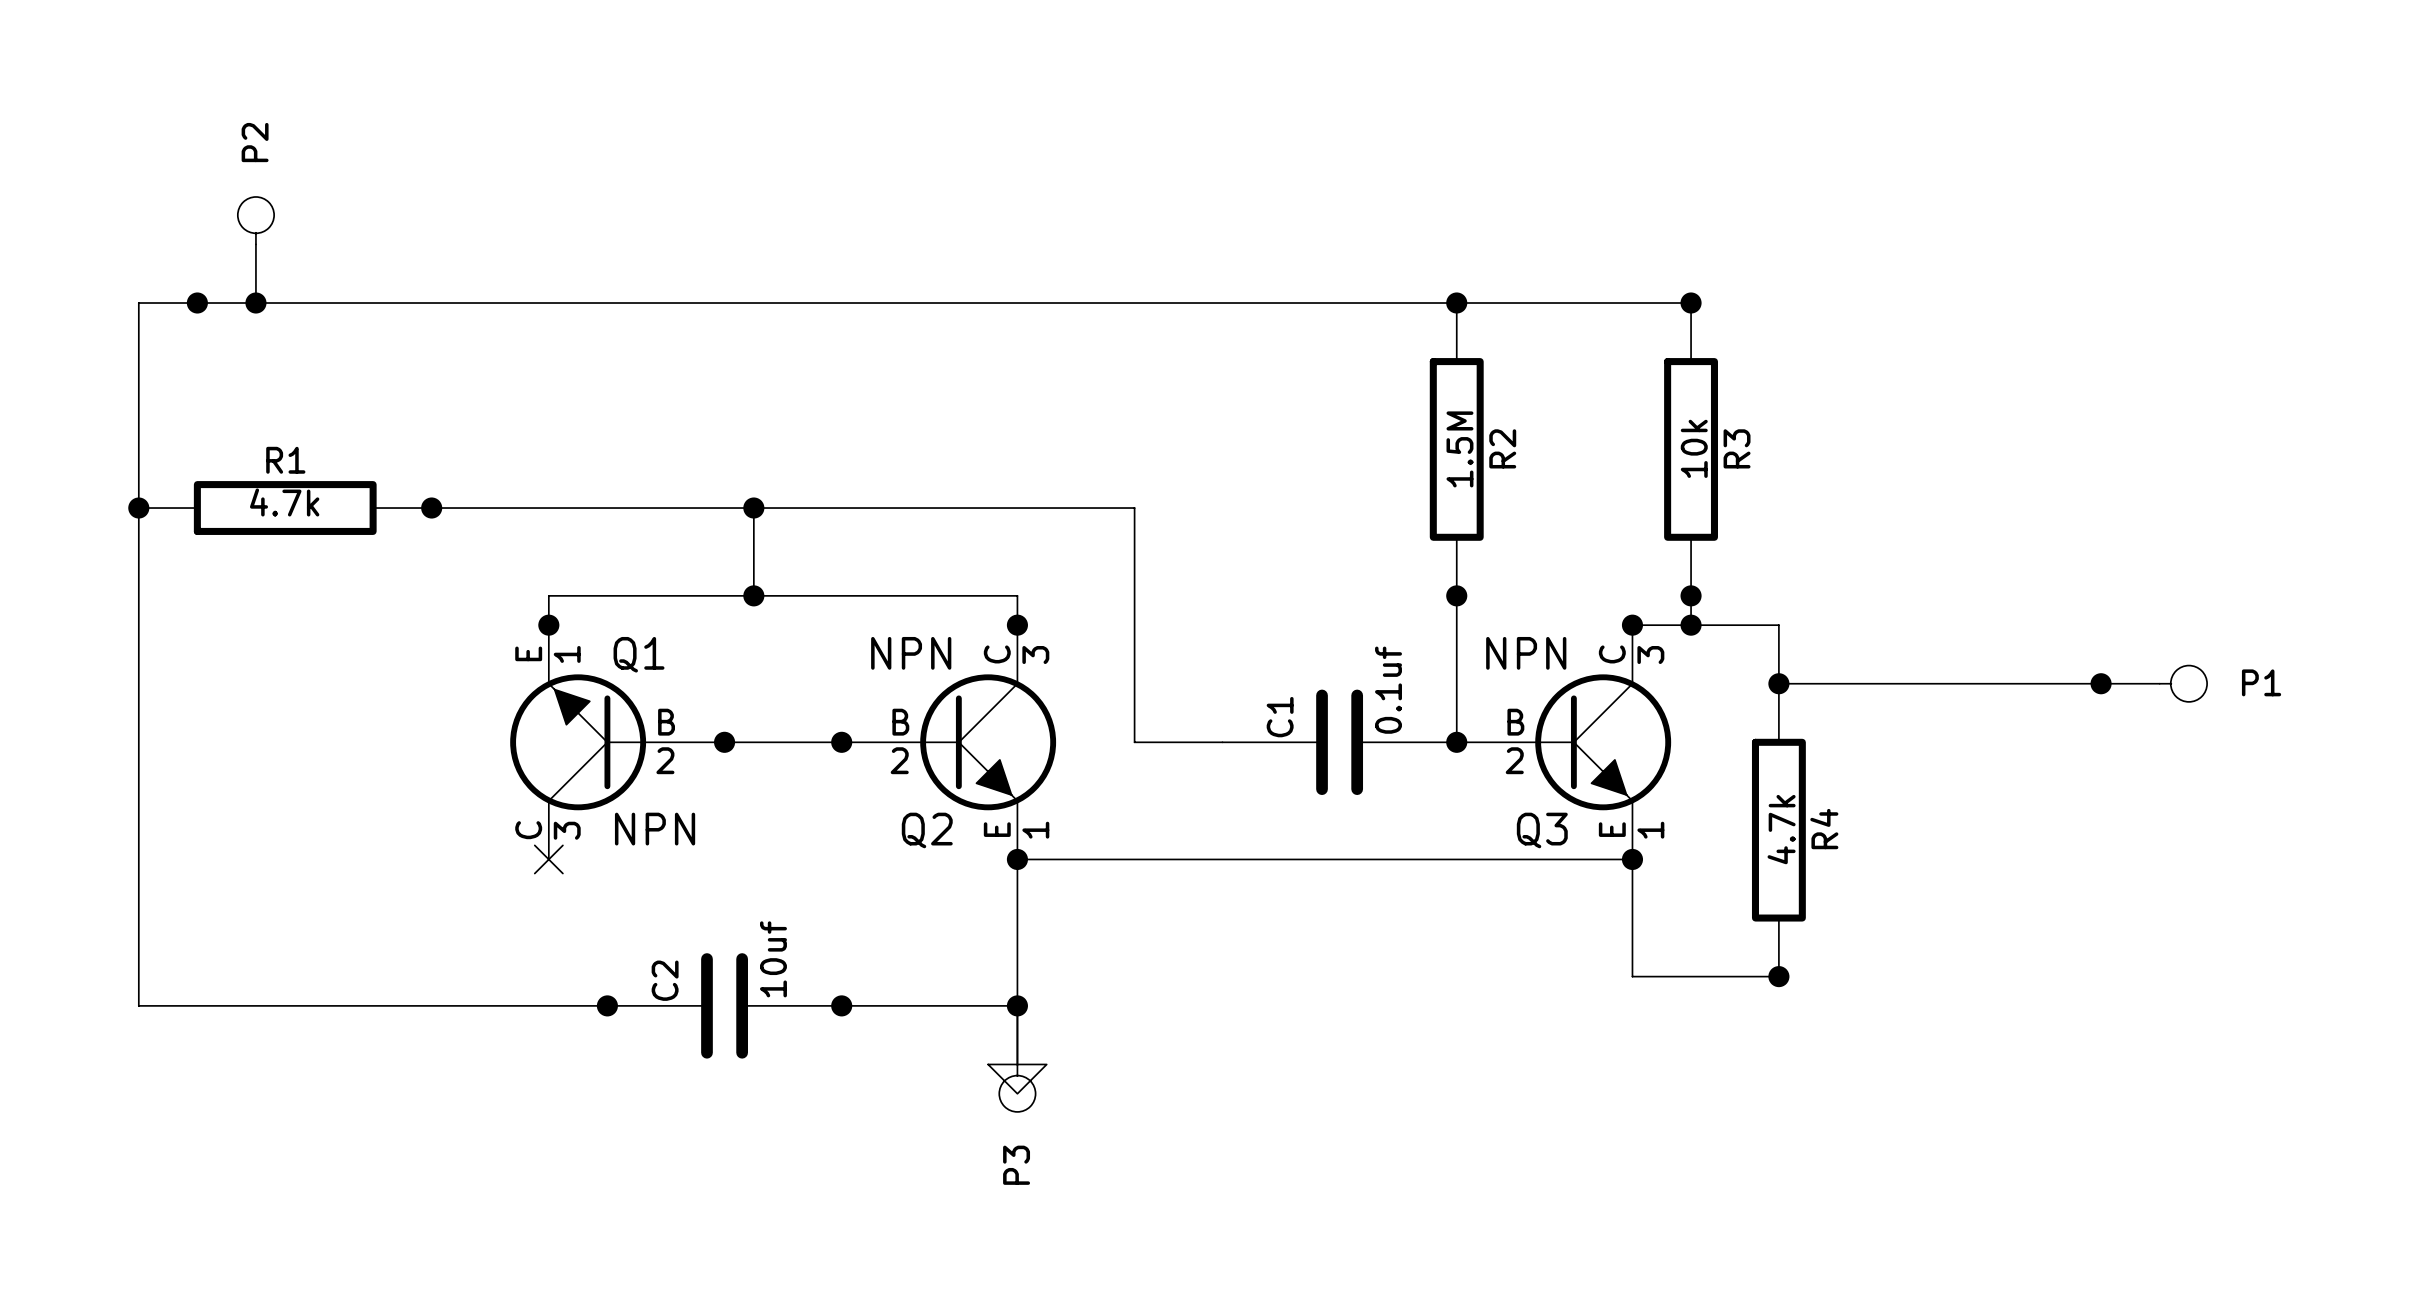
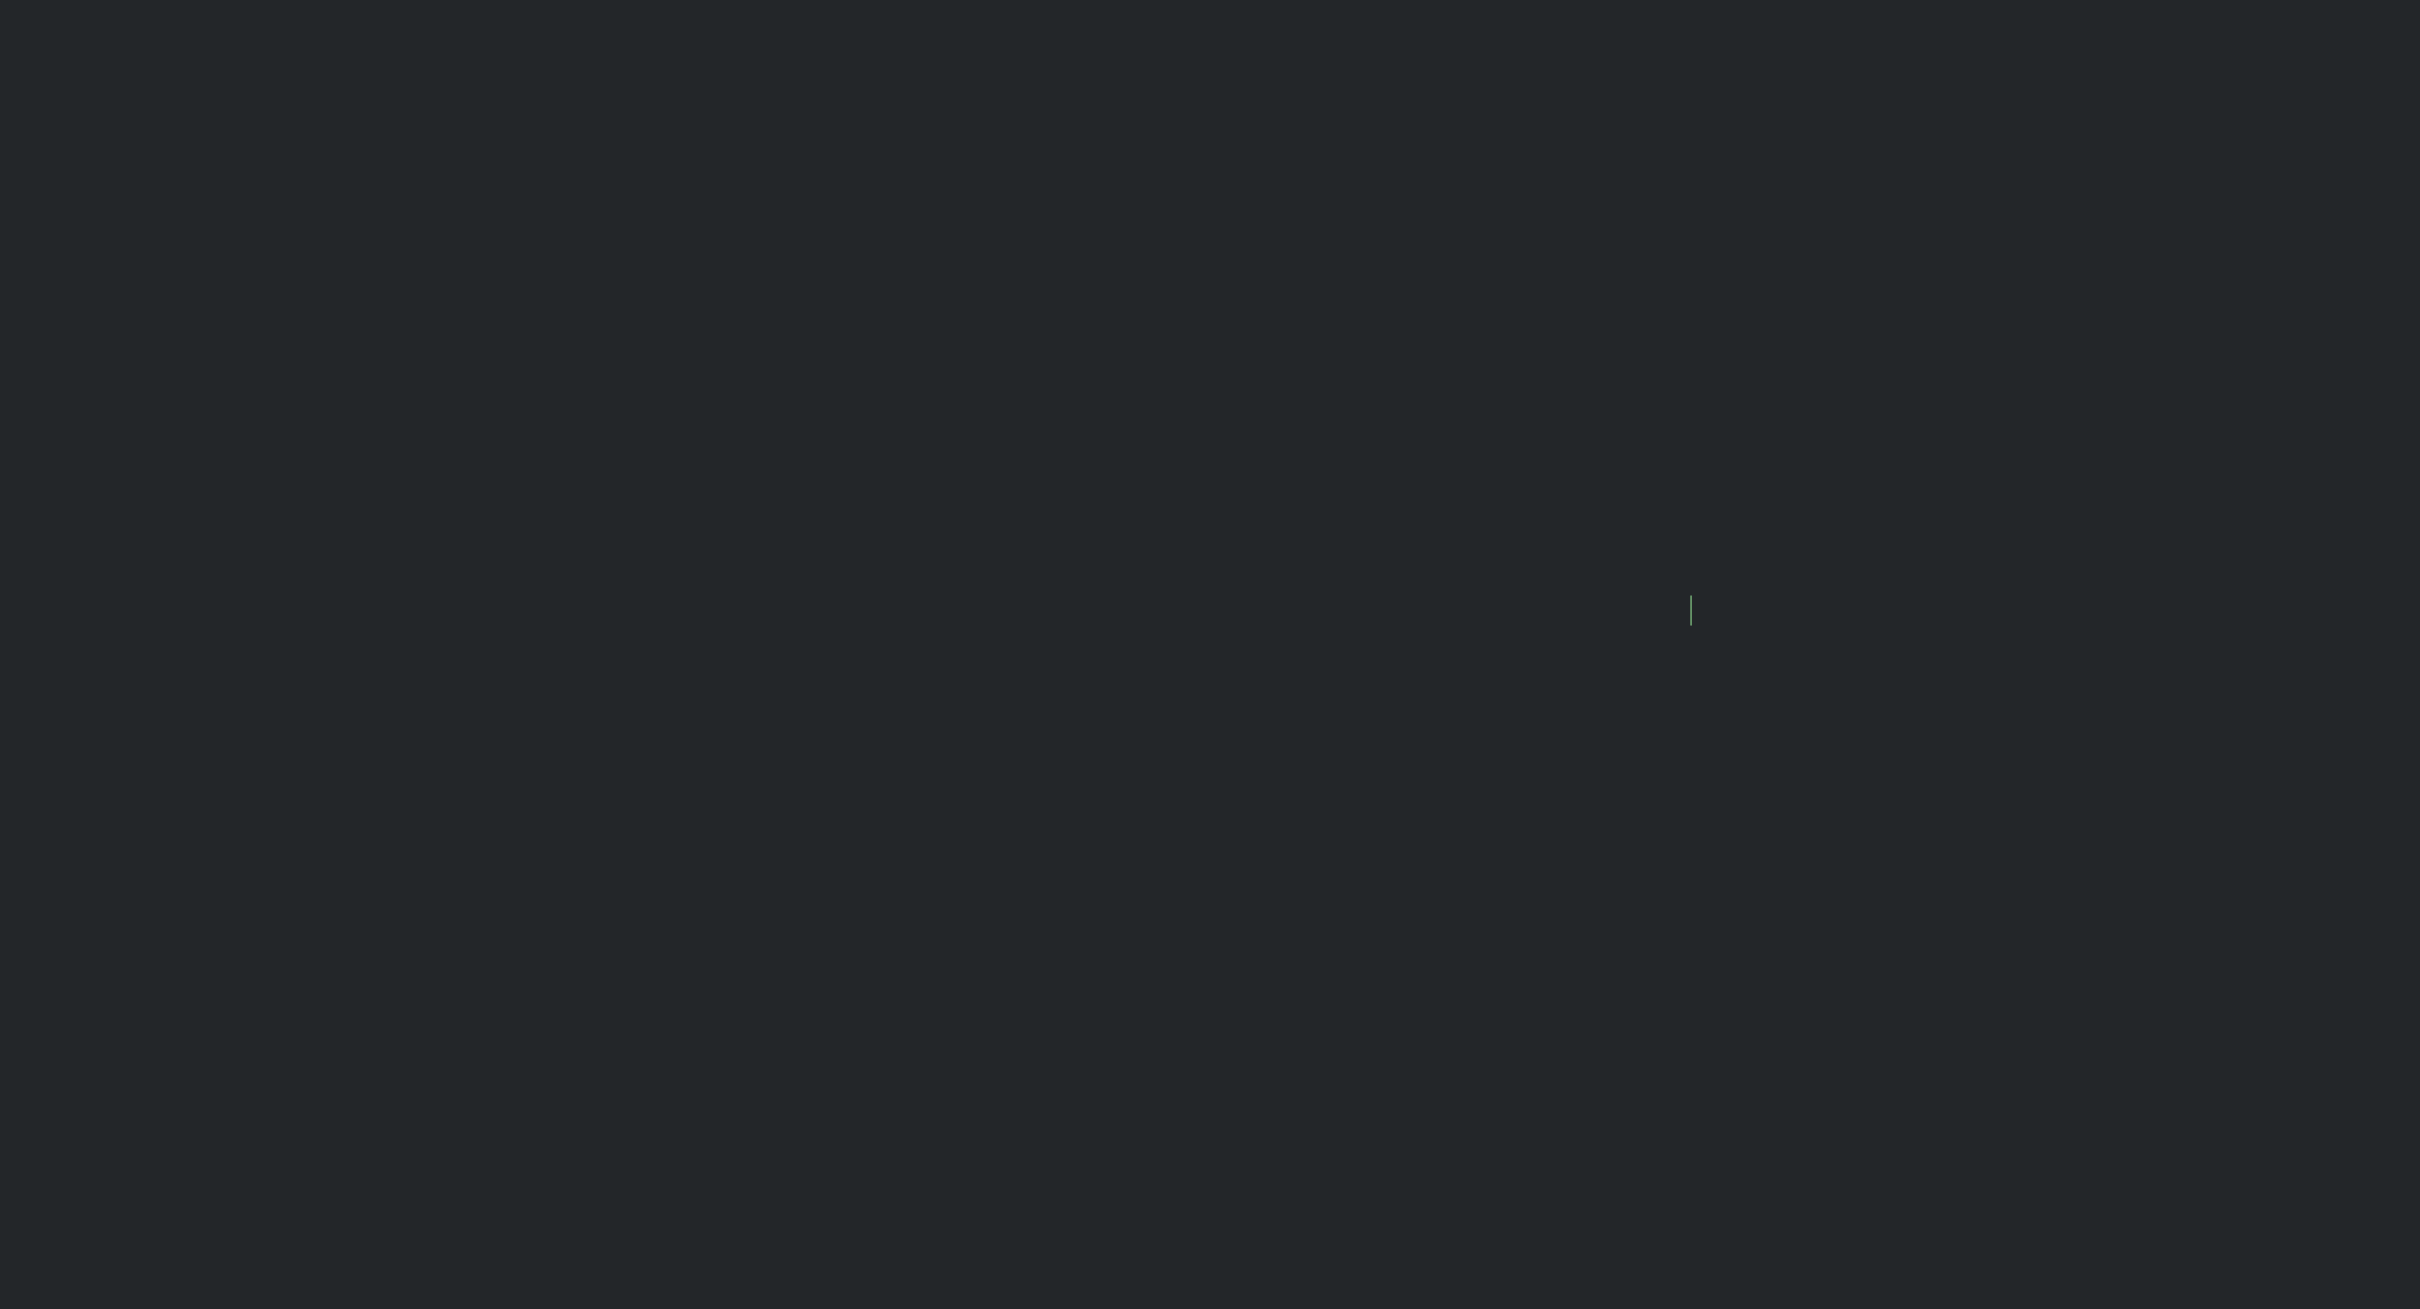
P2: (255, 249) -> none
junction: (197, 303) -> none
junction: (255, 303) -> none
junction: (1456, 303) -> none
wire: (1691, 303) (138, 303) (138, 1005) (607, 1005) -> none
junction: (1691, 303) -> none
R2: 1.5M (1456, 449) -> none
R3: 10k (1691, 449) -> none
junction: (138, 508) -> none
R1: 4.7k (285, 508) -> none
wire: (431, 508) (1134, 508) (1134, 742) (1222, 742) -> none
junction: (431, 508) -> none
wire: (753, 508) (753, 595) -> none
junction: (753, 508) -> none
junction: (753, 595) -> none
wire: (1456, 595) (1456, 742) -> none
junction: (1456, 595) -> none
junction: (1691, 595) -> none
wire: (548, 625) (548, 595) (1017, 595) (1017, 625) -> none
junction: (548, 625) -> none
junction: (1017, 625) -> none
wire: (1632, 625) (1778, 625) (1778, 683) (2101, 683) -> none
junction: (1632, 625) -> none
junction: (1691, 625) -> none
junction: (1778, 683) -> none
junction: (2101, 683) -> none
P1: (2154, 683) -> none
Q1: NPN (617, 742) -> none
wire: (724, 742) (841, 742) -> none
junction: (724, 742) -> none
junction: (841, 742) -> none
Q2: NPN (948, 742) -> none
C1: 0.1uf (1339, 742) -> none
junction: (1456, 742) -> none
Q3: NPN (1563, 742) -> none
R4: 4.7k (1778, 830) -> none
no-connect mark: (548, 859) -> none
junction: (1017, 859) -> none
junction: (1632, 859) -> none
wire: (1778, 976) (1632, 976) (1632, 859) (1017, 859) (1017, 1064) -> none
junction: (1778, 976) -> none
junction: (607, 1005) -> none
C2: 10uf (724, 1005) -> none
wire: (841, 1005) (1017, 1005) -> none
junction: (841, 1005) -> none
junction: (1017, 1005) -> none
P3: (1017, 1058) -> none
power symbol: (1017, 1079) -> none

